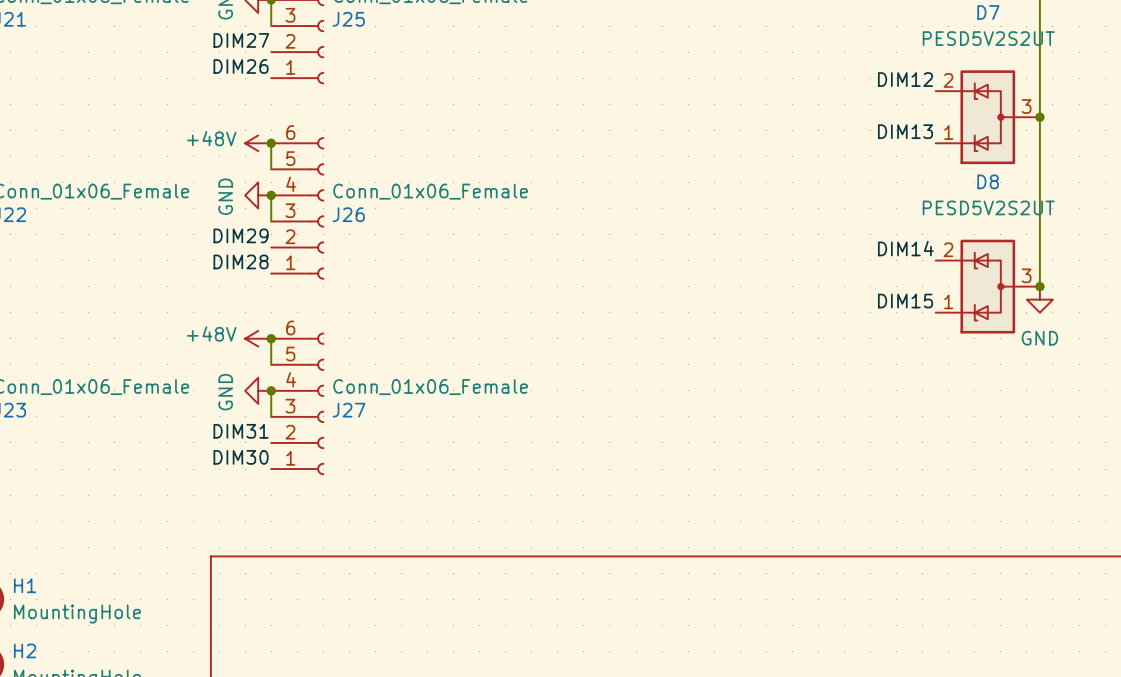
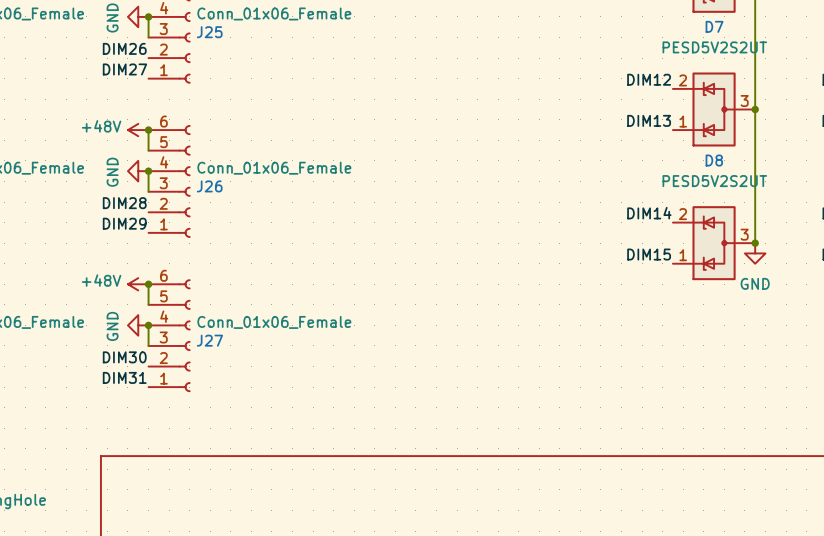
label: DIM27 (241, 40) -> DIM26 (124, 48)
label: DIM26 (241, 66) -> DIM27 (124, 69)
label: DIM29 (241, 235) -> DIM28 (124, 203)
label: DIM28 (241, 261) -> DIM29 (124, 223)
label: DIM31 (241, 431) -> DIM30 (124, 357)
label: DIM30 (241, 457) -> DIM31 (124, 377)

